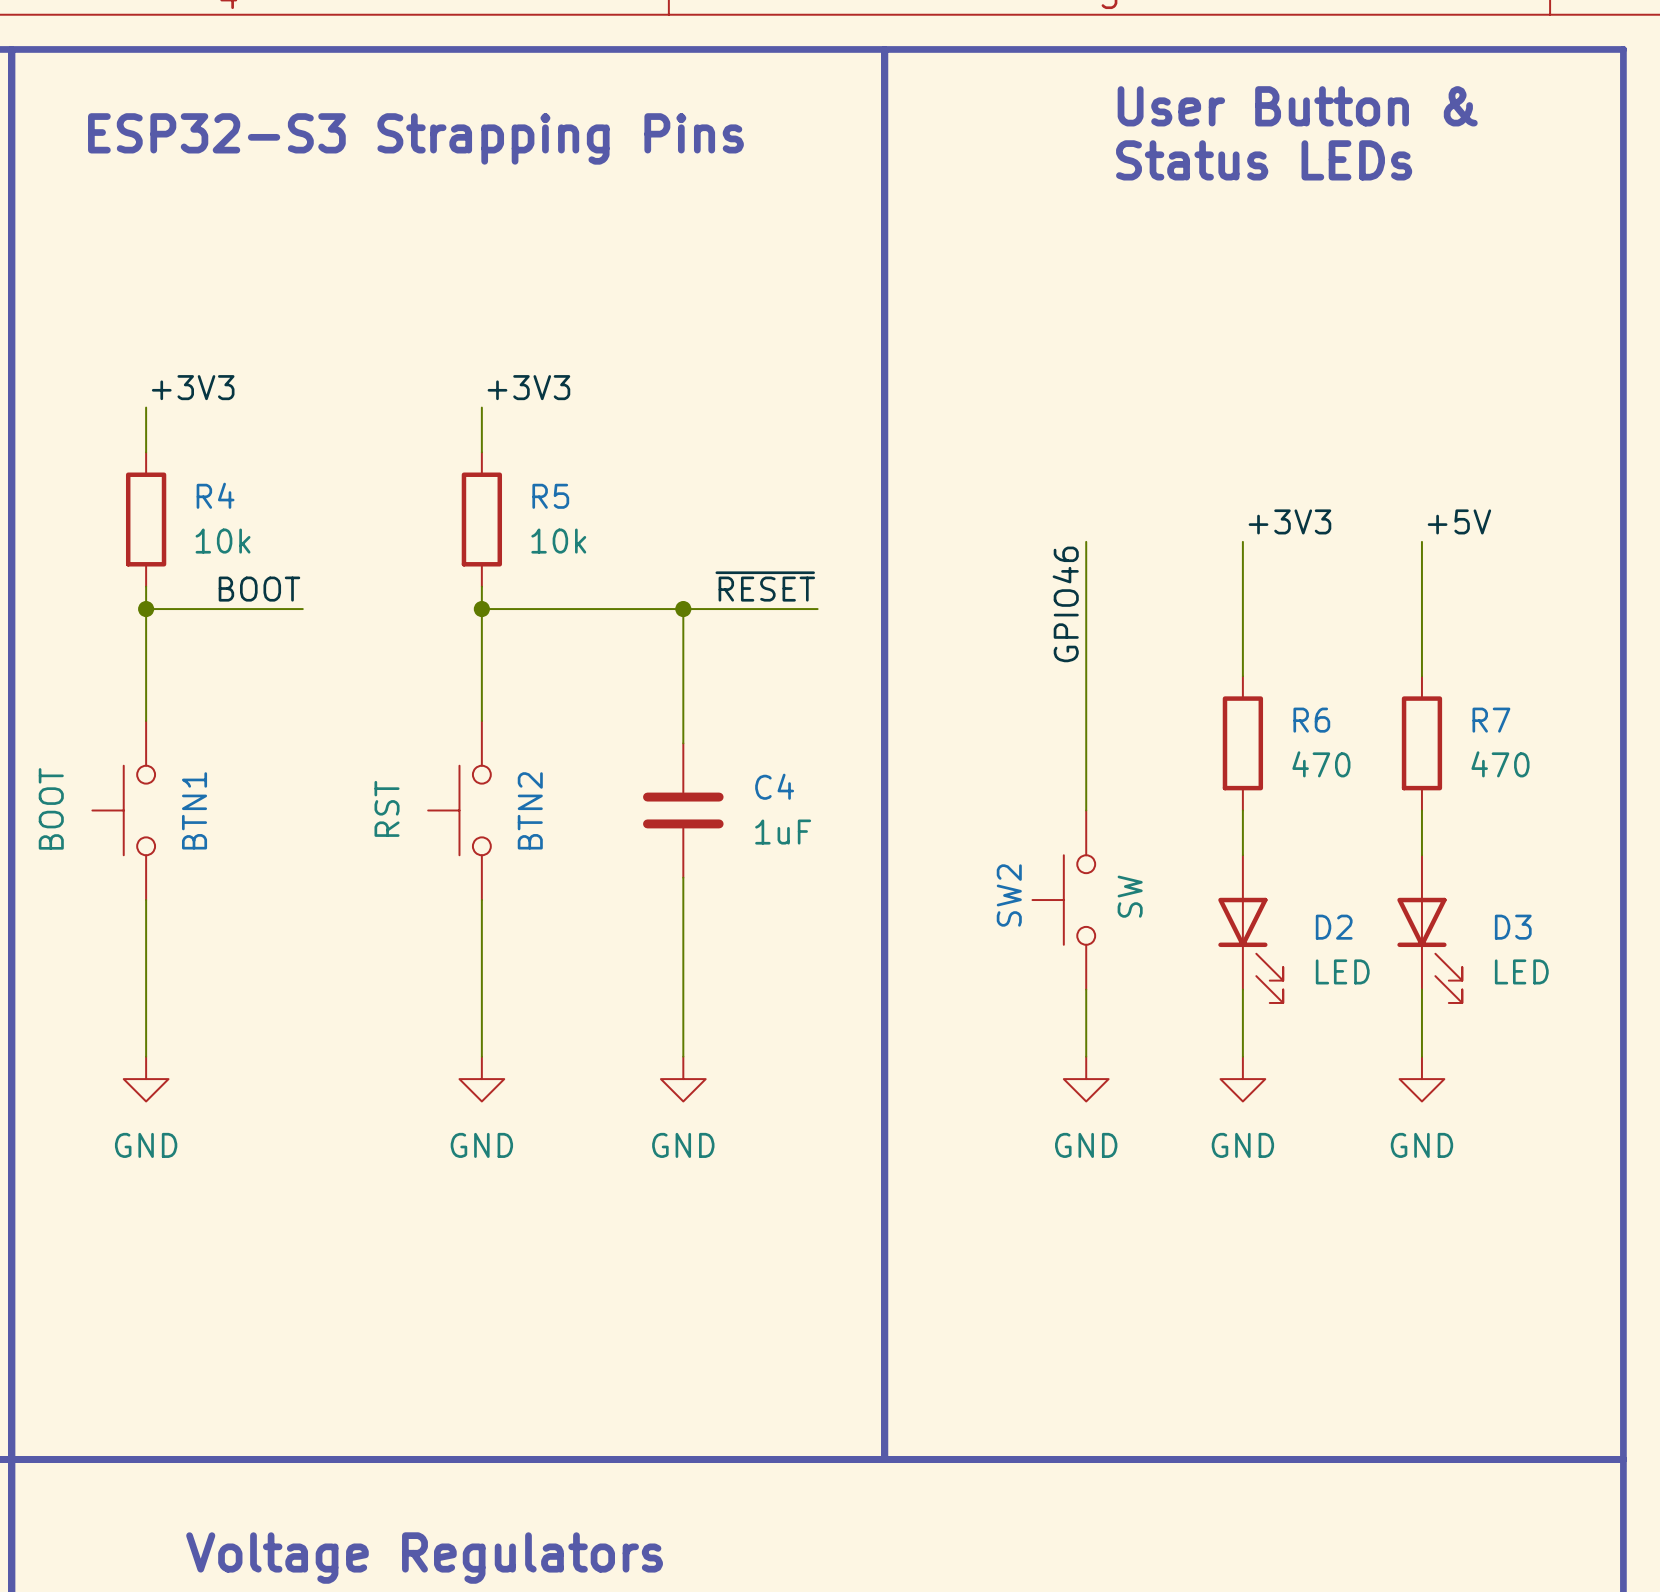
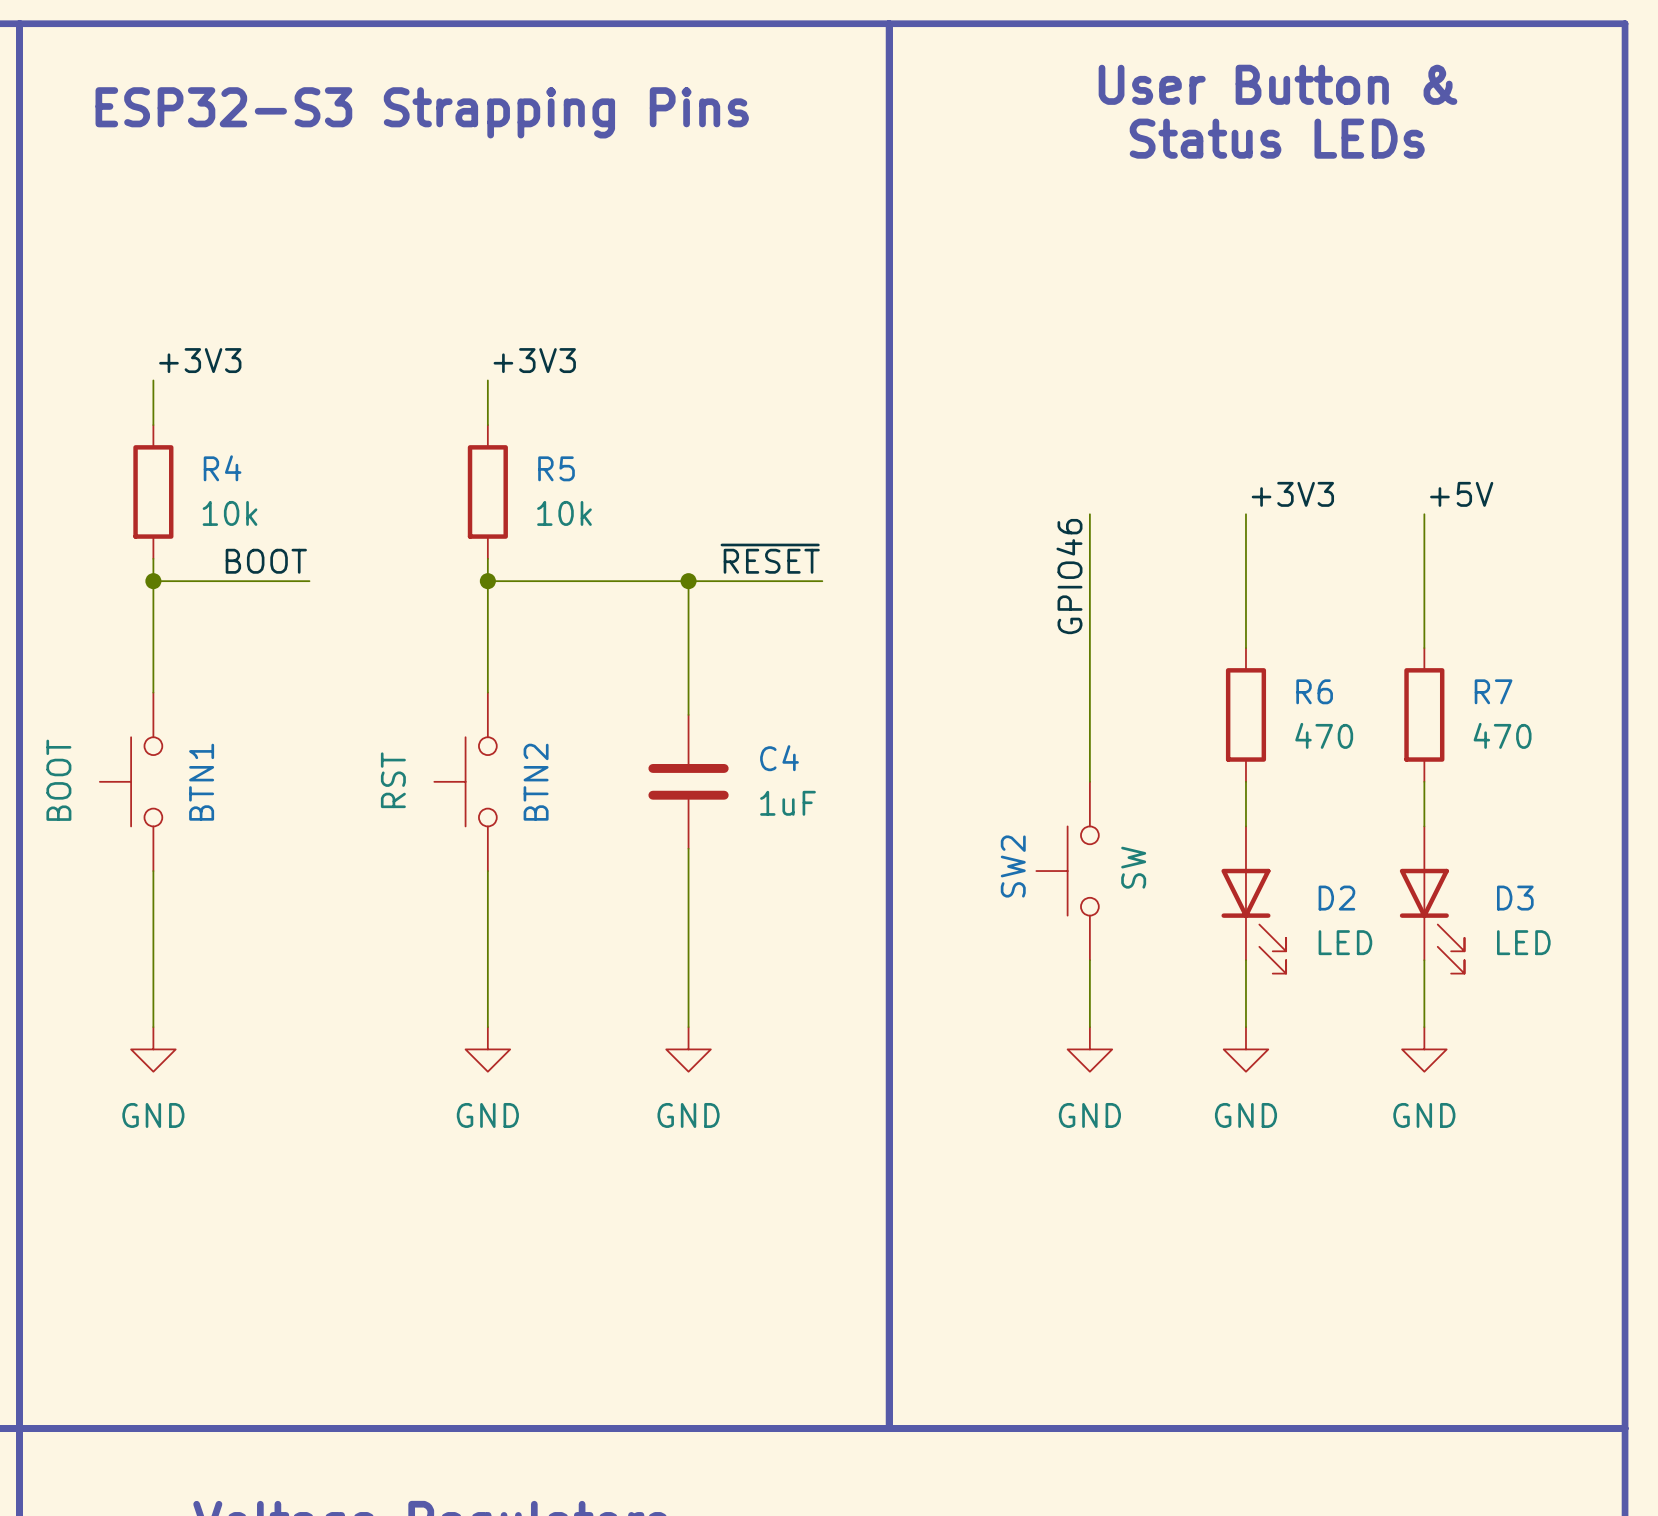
text position: User Button & (1297, 106) -> User Button & (1278, 84)
text position: Status LEDs (1264, 160) -> Status LEDs (1277, 138)

